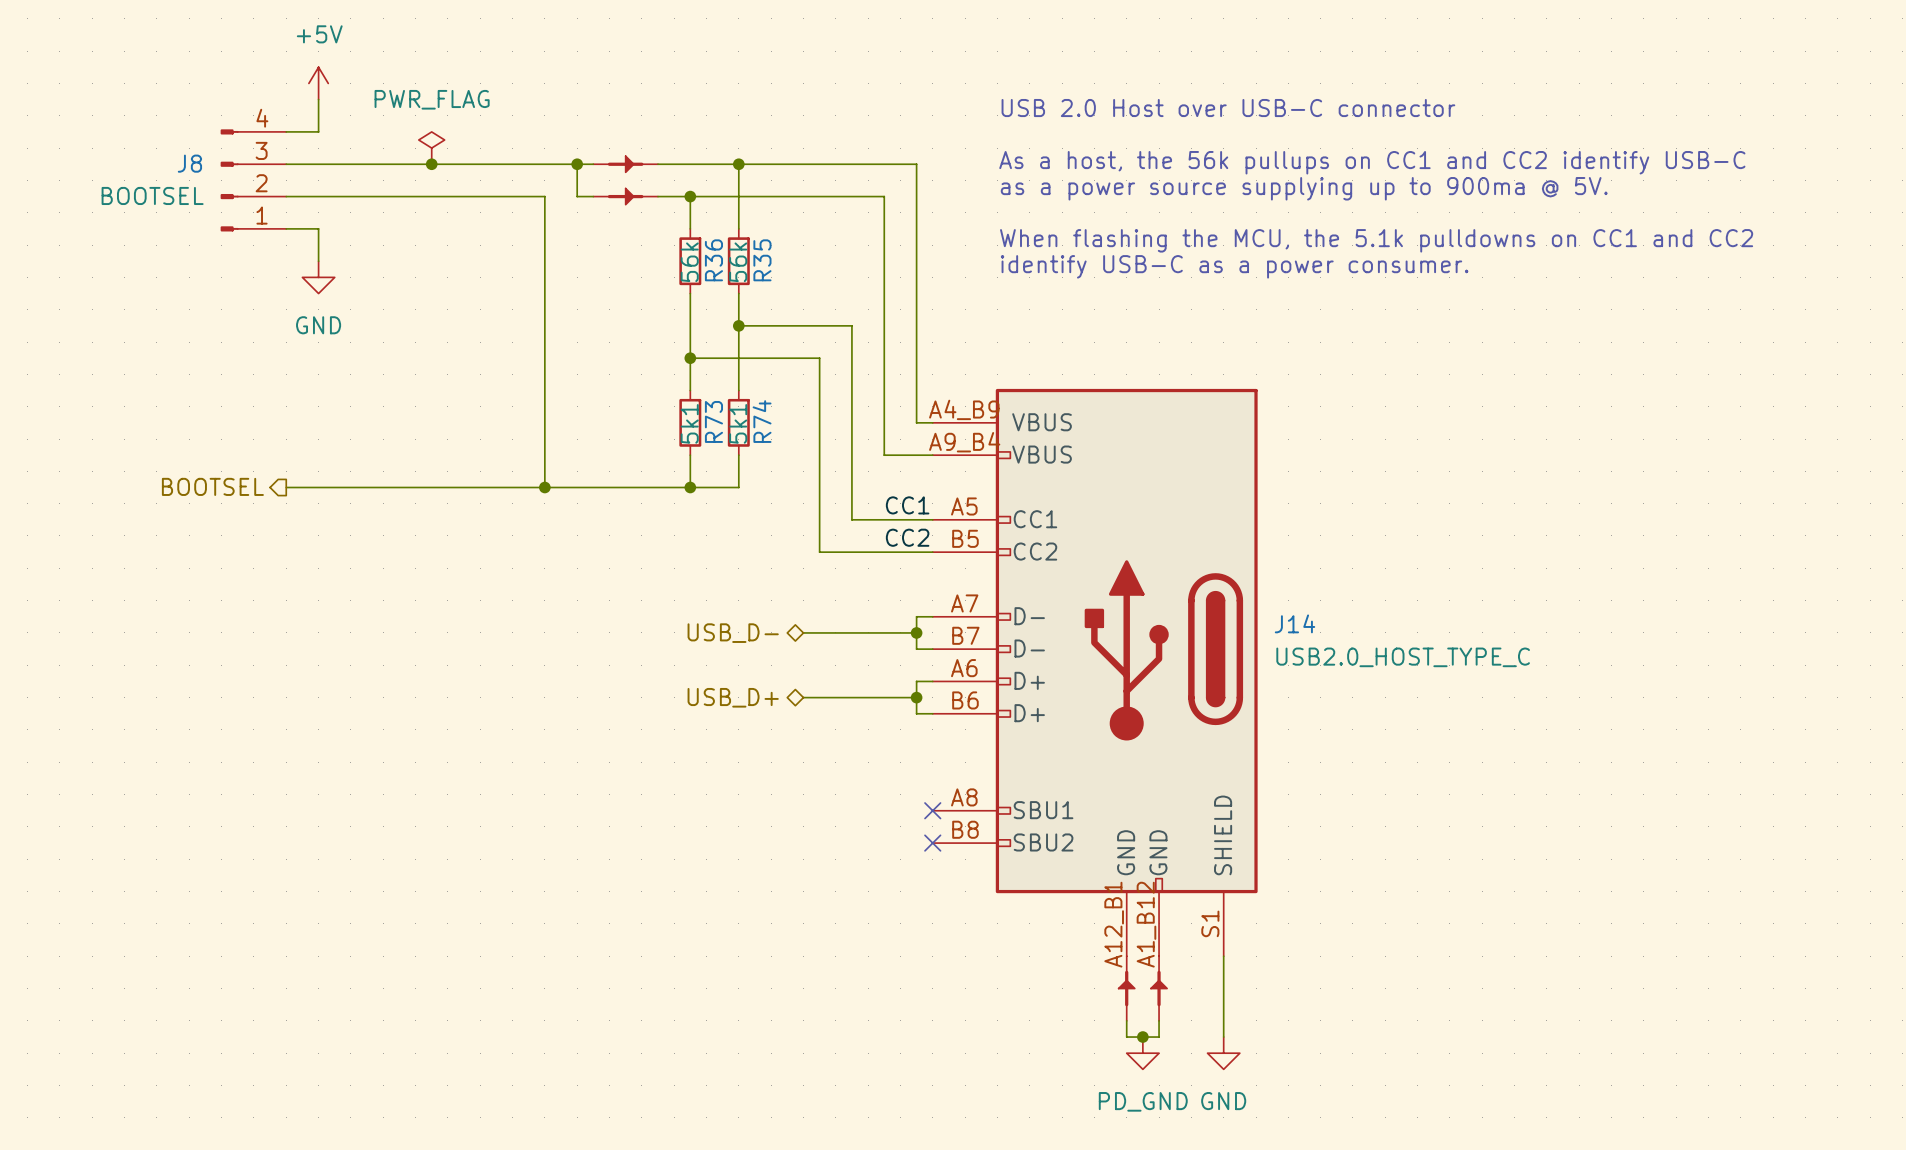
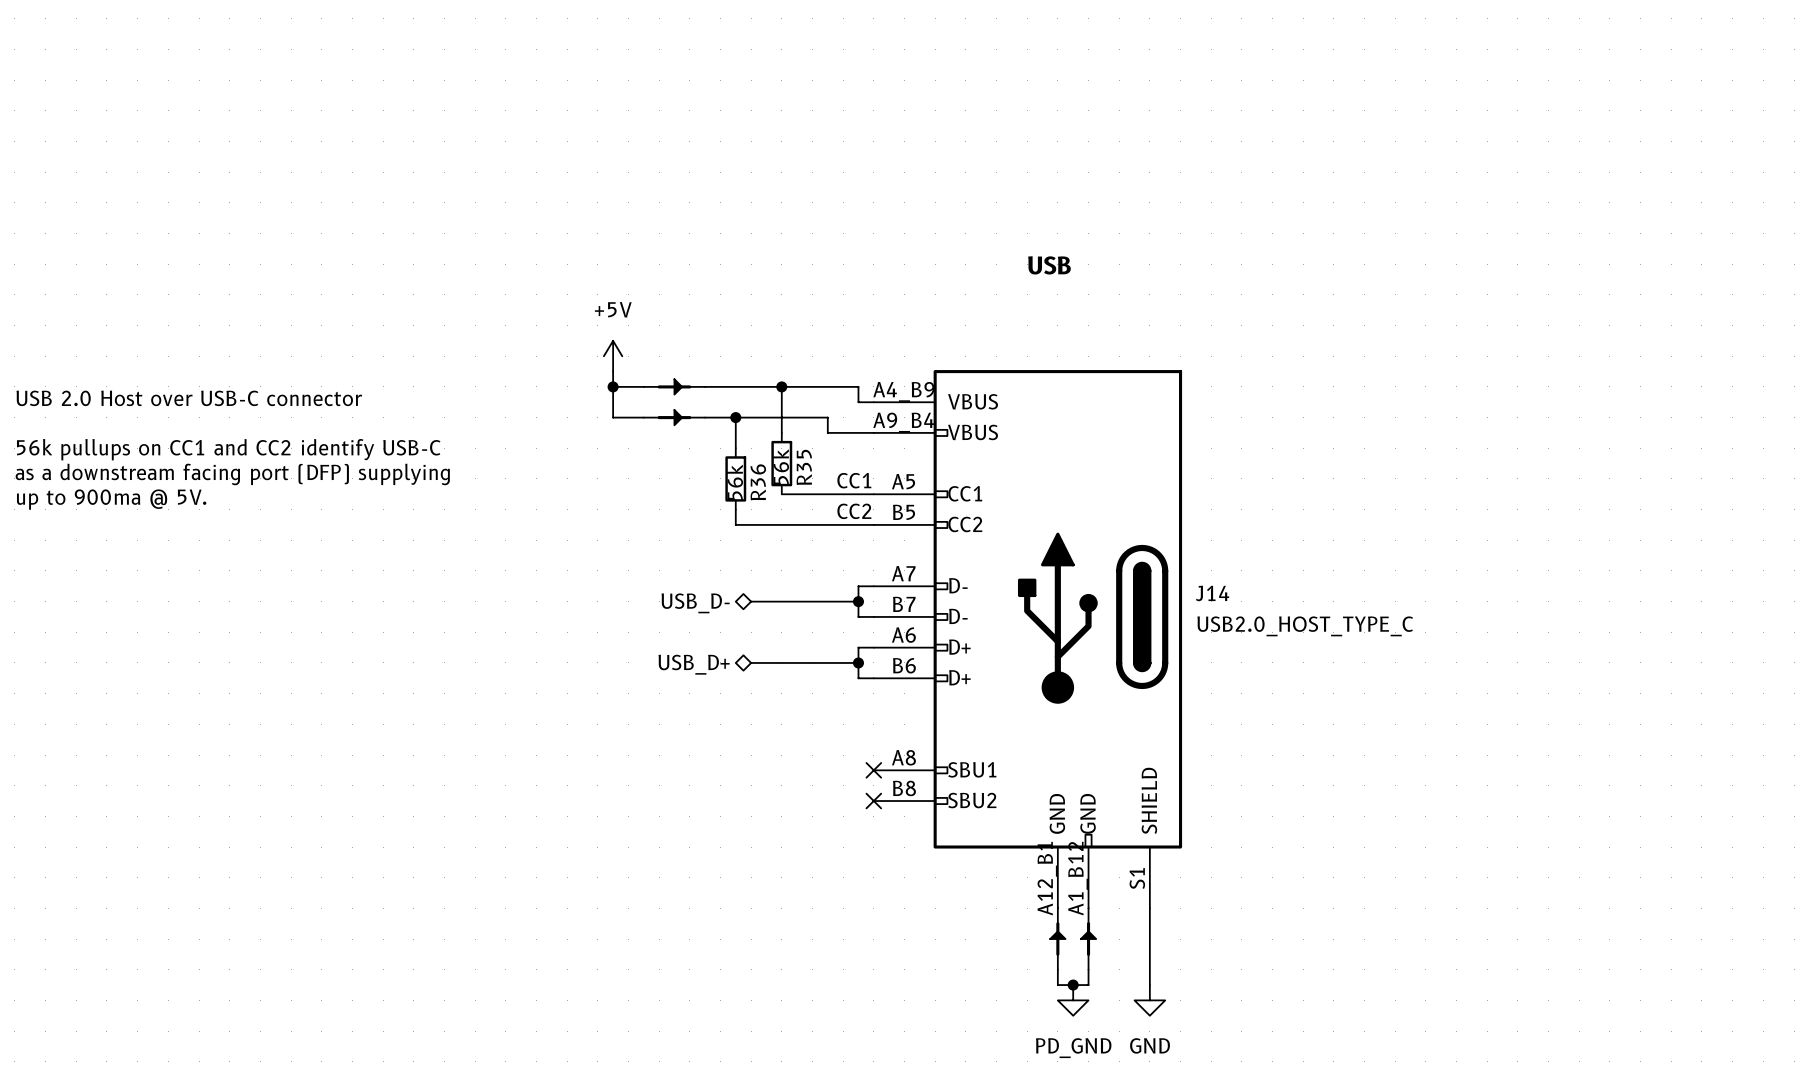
power symbol: +5V (318, 83) -> none
wire: (318, 99) (318, 131) (286, 131) -> none
text: USB 2.0 Host over USB-C connector (1228, 108) -> none
power symbol: PWR_FLAG (431, 148) -> none
text: As a host, the 56k pullups on CC1 and CC2 identify USB-C (1372, 162) -> none
wire: (286, 164) (593, 164) -> none
junction: (431, 164) -> none
wire: (577, 164) (577, 196) (593, 196) -> none
junction: (577, 164) -> none
part: (625, 164) -> none
wire: (657, 164) (916, 164) (916, 406) -> (705, 386) (858, 386)
wire: (738, 164) (738, 228) -> none
junction: (738, 164) -> none
J8: BOOTSEL (253, 180) -> none
text: as a power source supplying up to 900ma @ 5V. (1304, 188) -> none
wire: (286, 196) (544, 196) (544, 487) -> none
part: (625, 196) -> none
wire: (657, 196) (884, 196) (884, 439) -> (705, 417) (827, 417)
wire: (690, 196) (690, 228) -> none
junction: (690, 196) -> none
wire: (286, 228) (318, 228) (318, 261) -> none
text: When flashing the MCU, the 5.1k pulldowns on CC1 and CC2 (1376, 240) -> none
R36 position: (690, 261) -> (735, 478)
R35 position: (738, 261) -> (781, 463)
text: identify USB-C as a power consumer. (1234, 266) -> none
power symbol: GND (318, 277) -> none
text: none -> USB (1049, 265)
wire: (690, 293) (690, 390) -> none
wire: (738, 293) (738, 390) -> none
wire: (738, 325) (851, 325) (851, 519) -> (781, 494) (797, 494)
junction: (738, 325) -> none
wire: (690, 358) (819, 358) (819, 552) -> (735, 509) (735, 524) (766, 524)
junction: (690, 358) -> none
power symbol: none -> +5V (613, 356)
wire: none -> (613, 371) (613, 417) (643, 417)
wire: none -> (613, 386) (643, 386)
junction: none -> (613, 386)
part: none -> (674, 386)
wire: none -> (781, 386) (781, 432)
junction: none -> (781, 386)
text: none -> USB 2.0 Host over USB-C connector (189, 398)
R73: 5k1 (690, 422) -> none
R74: 5k1 (738, 422) -> none
part: none -> (674, 417)
junction: none -> (735, 417)
wire: (690, 455) (690, 487) -> (735, 417) (735, 448)
wire: (738, 455) (738, 487) (286, 487) -> none
text: none -> 56k pullups on CC1 and CC2 identify USB-C (228, 449)
hierarchical label: BOOTSEL (212, 486) -> none
junction: (544, 487) -> none
junction: (690, 487) -> none
text: none -> as a downstream facing port (DFP) supplying (232, 474)
text: none -> up to 900ma @ 5V. (111, 499)

